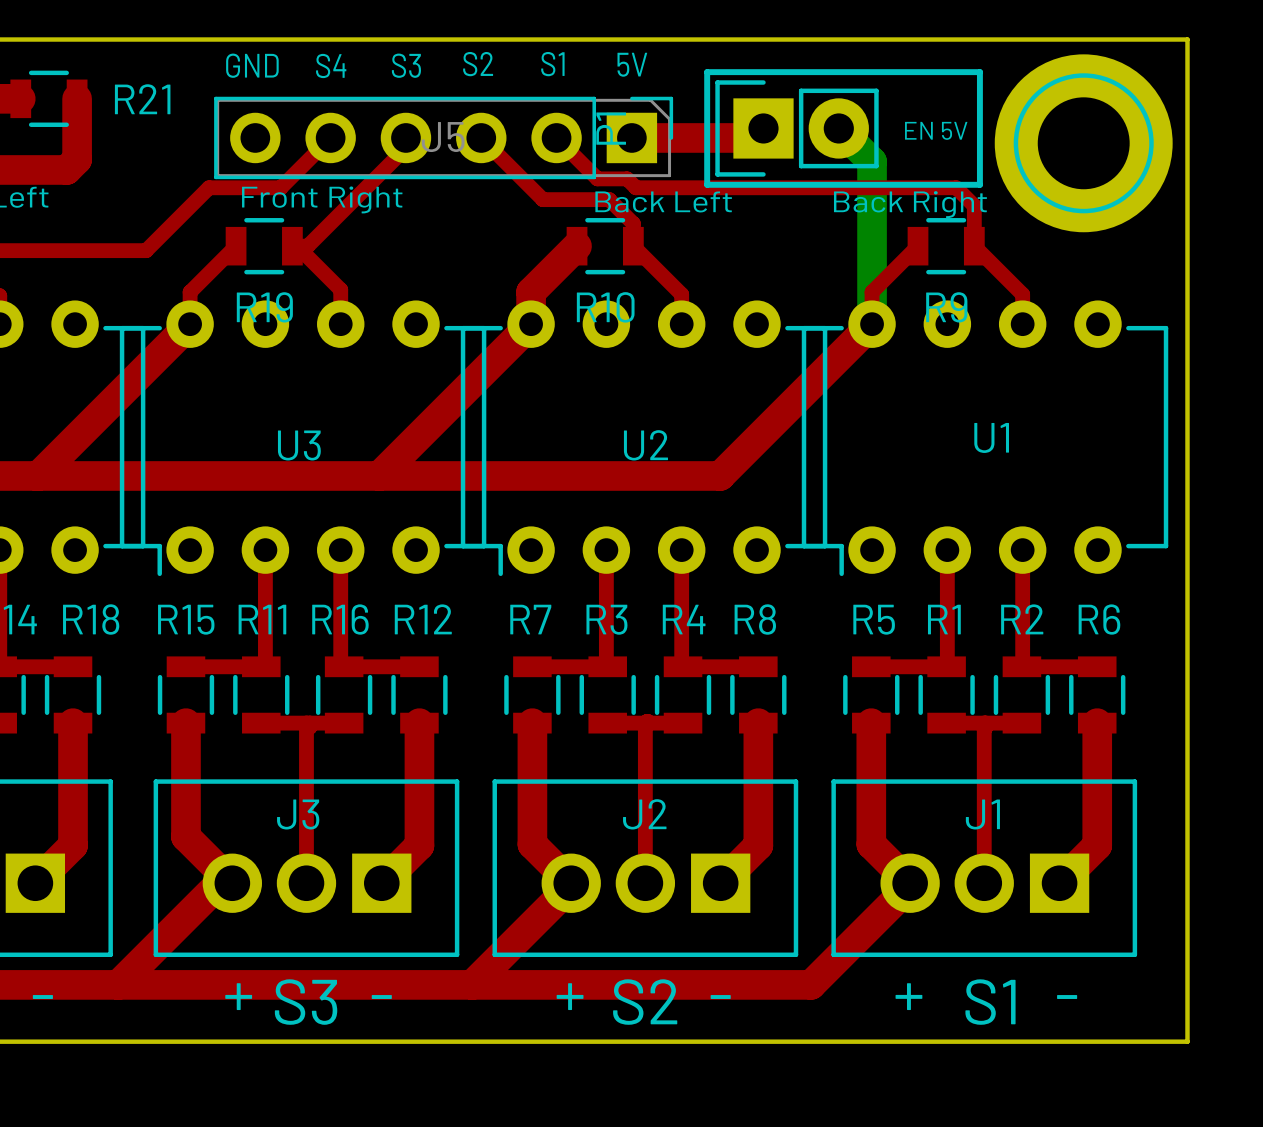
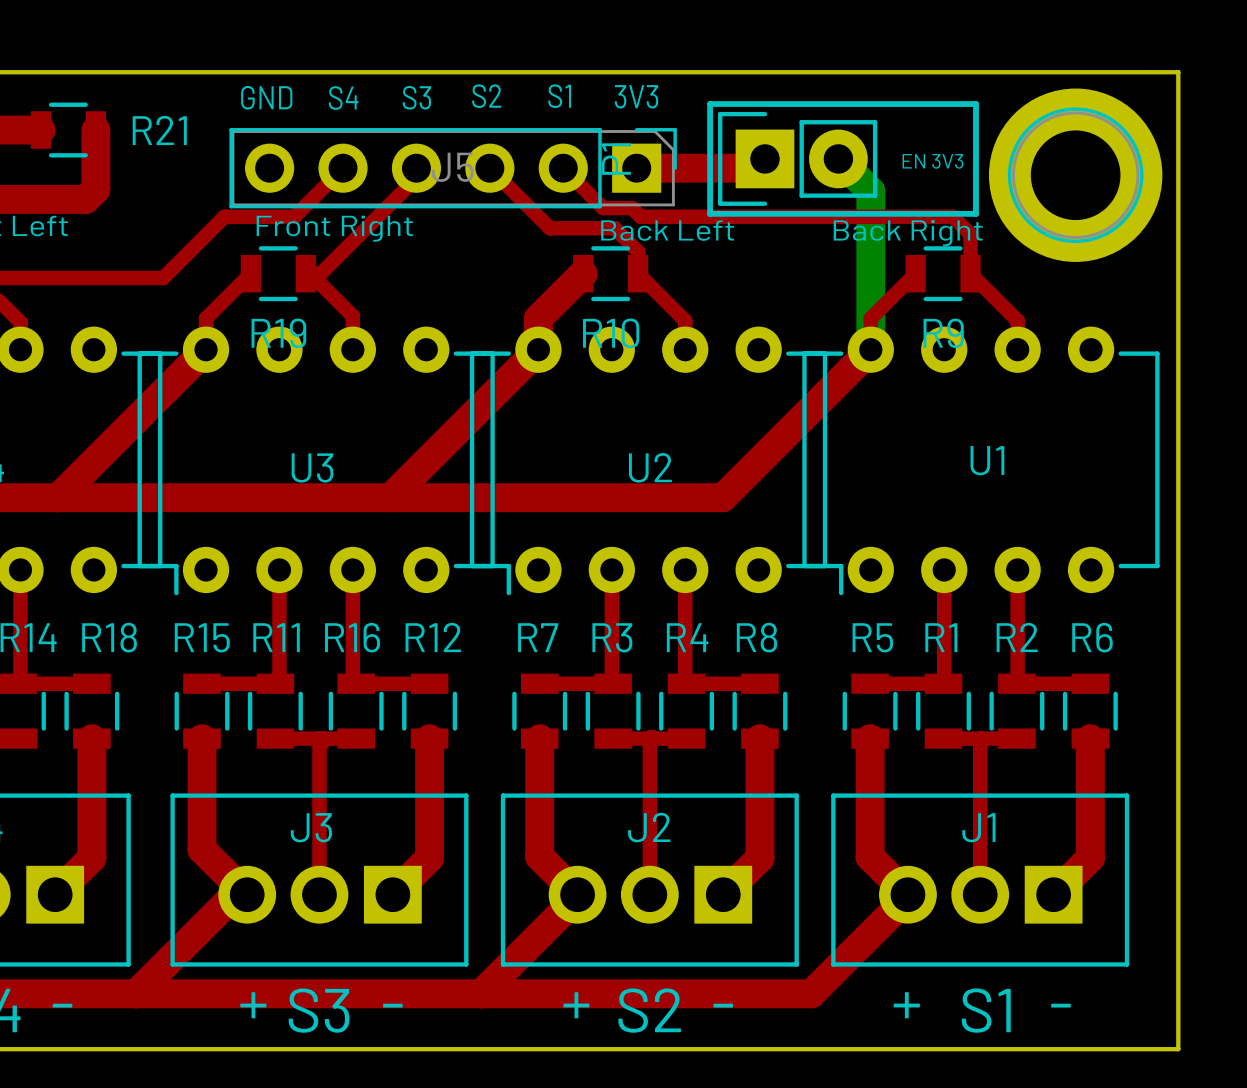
part footprint: [994, 54, 1173, 233] -> [988, 88, 1163, 262]
text: 5V (632, 64) -> 3V3 (636, 96)
text: EN 5V (936, 130) -> EN 3V3 (932, 161)

